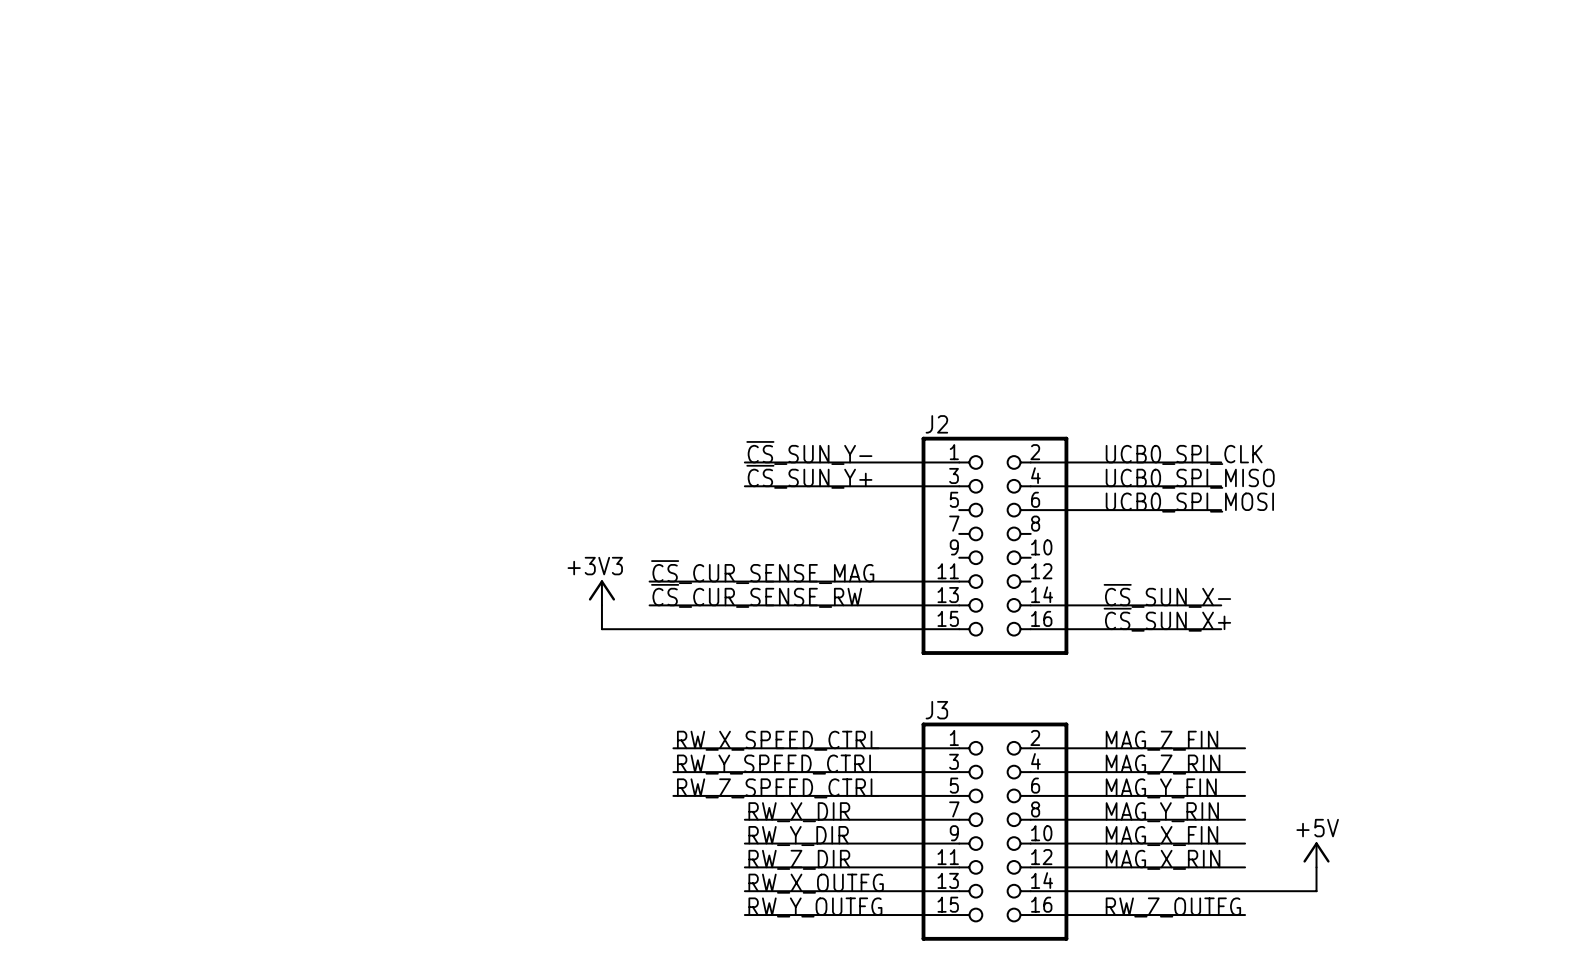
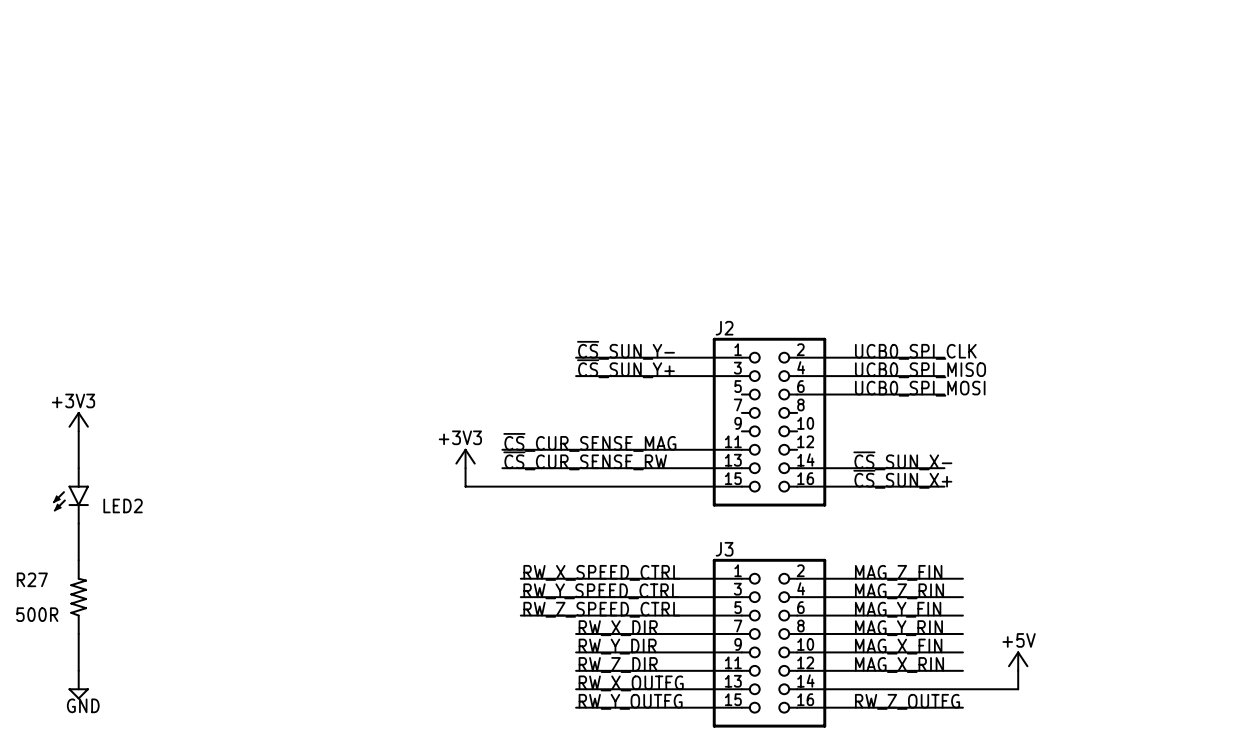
power symbol: none -> +3V3 (78, 421)
wire: none -> (78, 431) (78, 468)
LED2: none -> (71, 495)
wire: none -> (78, 523) (78, 560)
R27: none -> 500R (78, 597)
wire: none -> (78, 634) (78, 670)
power symbol: none -> GND (78, 685)

